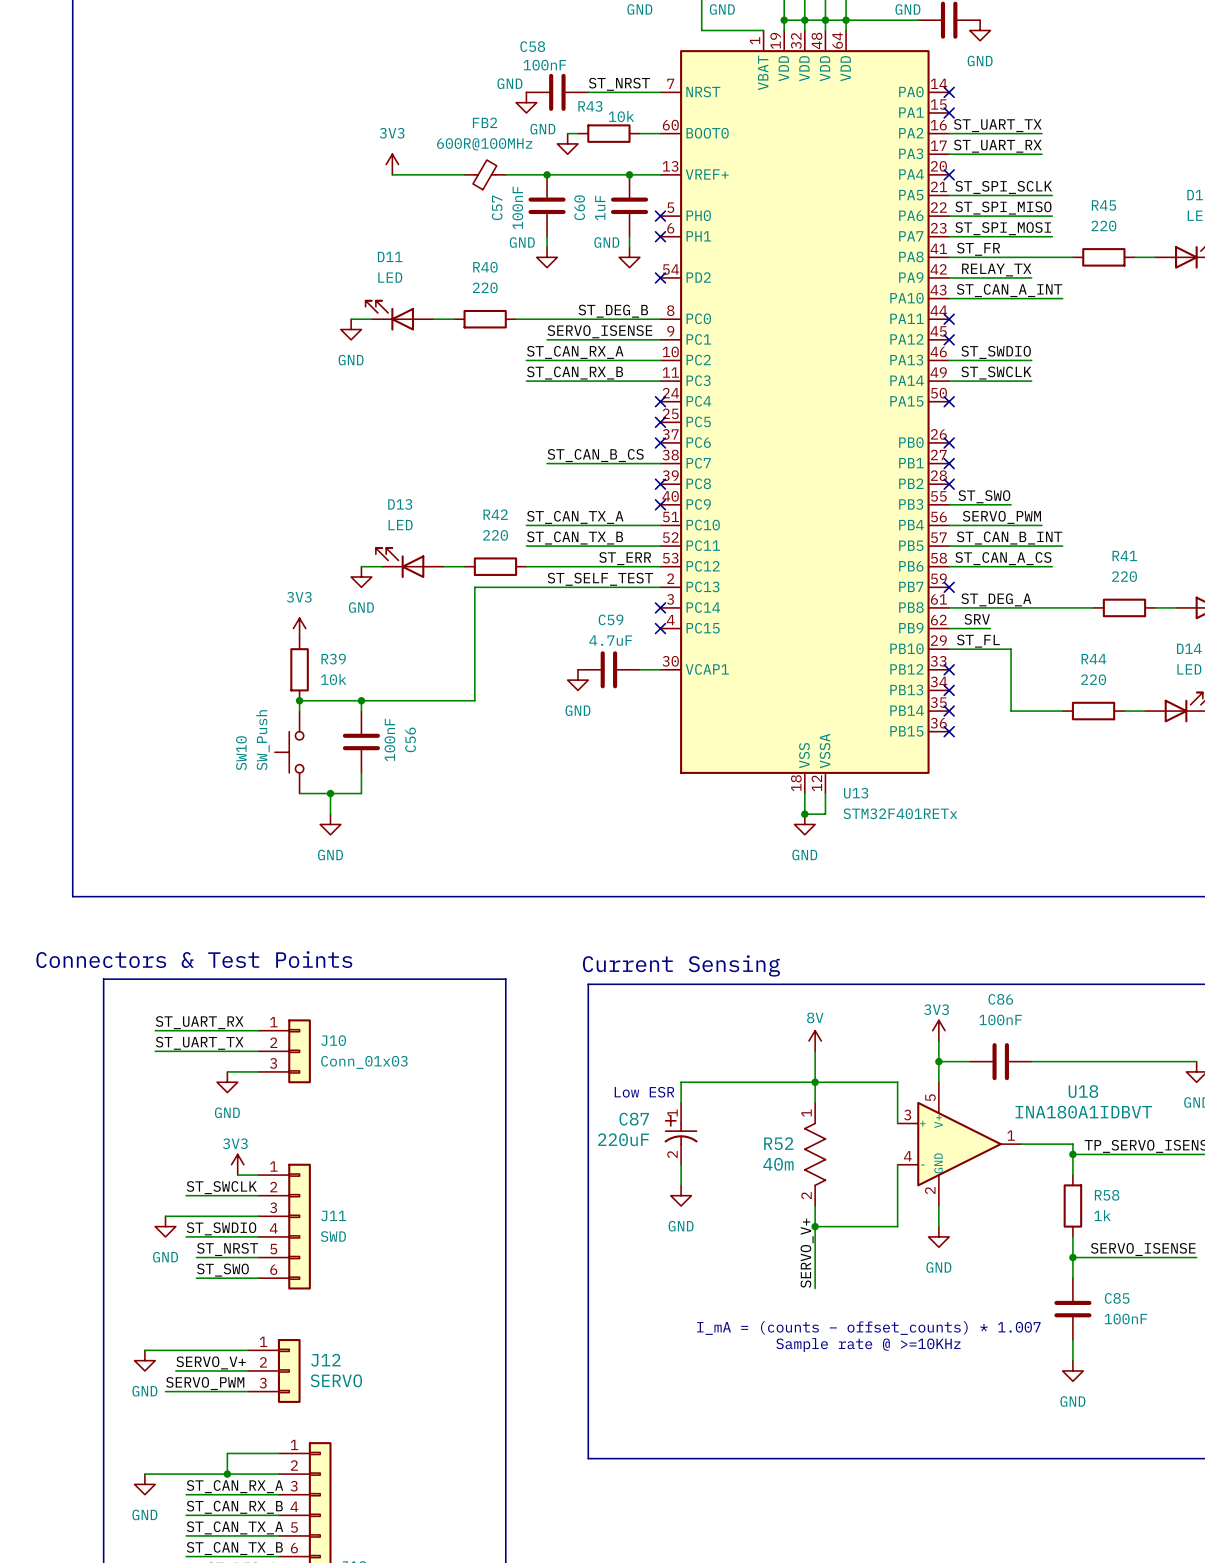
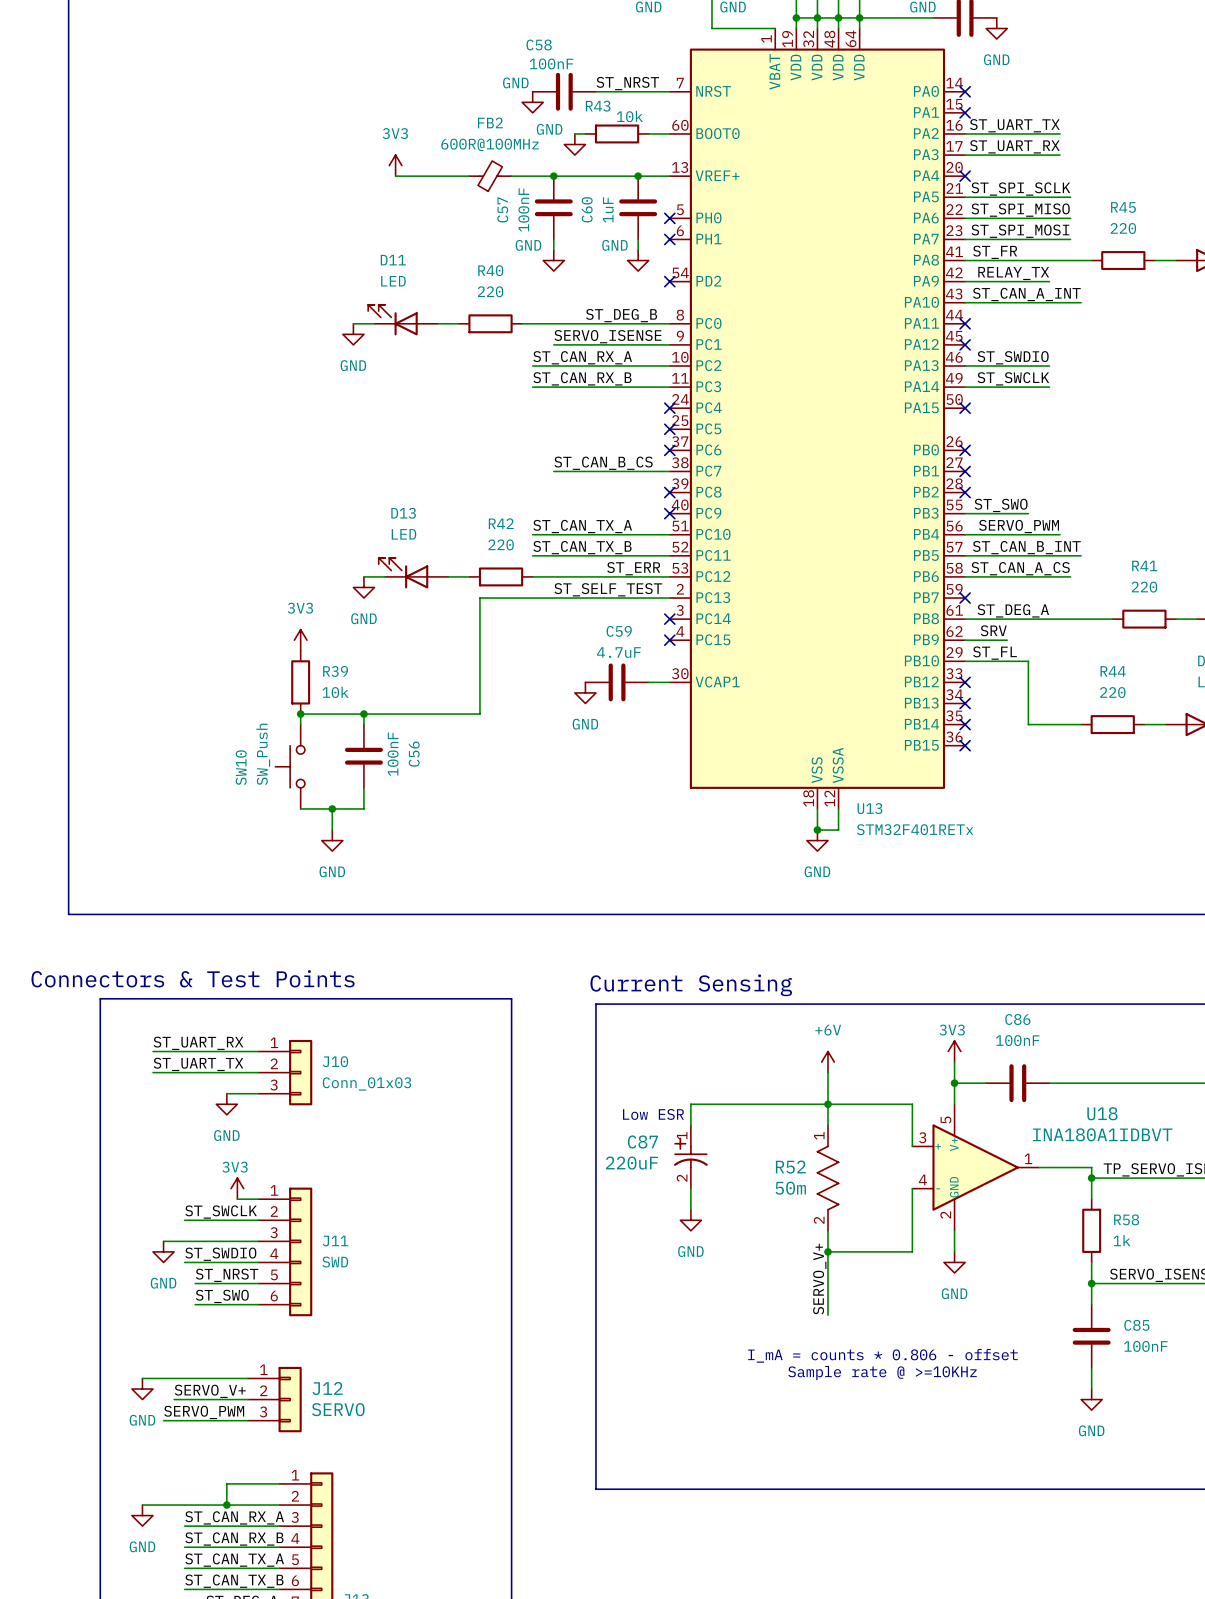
power symbol: 8V (815, 1041) -> +6V (828, 1062)
R52 value: 40m (778, 1164) -> 50m (790, 1188)
text: I_mA = (counts − offset_counts) * 1.007 (868, 1328) -> I_mA = counts * 0.806 - offset (882, 1355)

